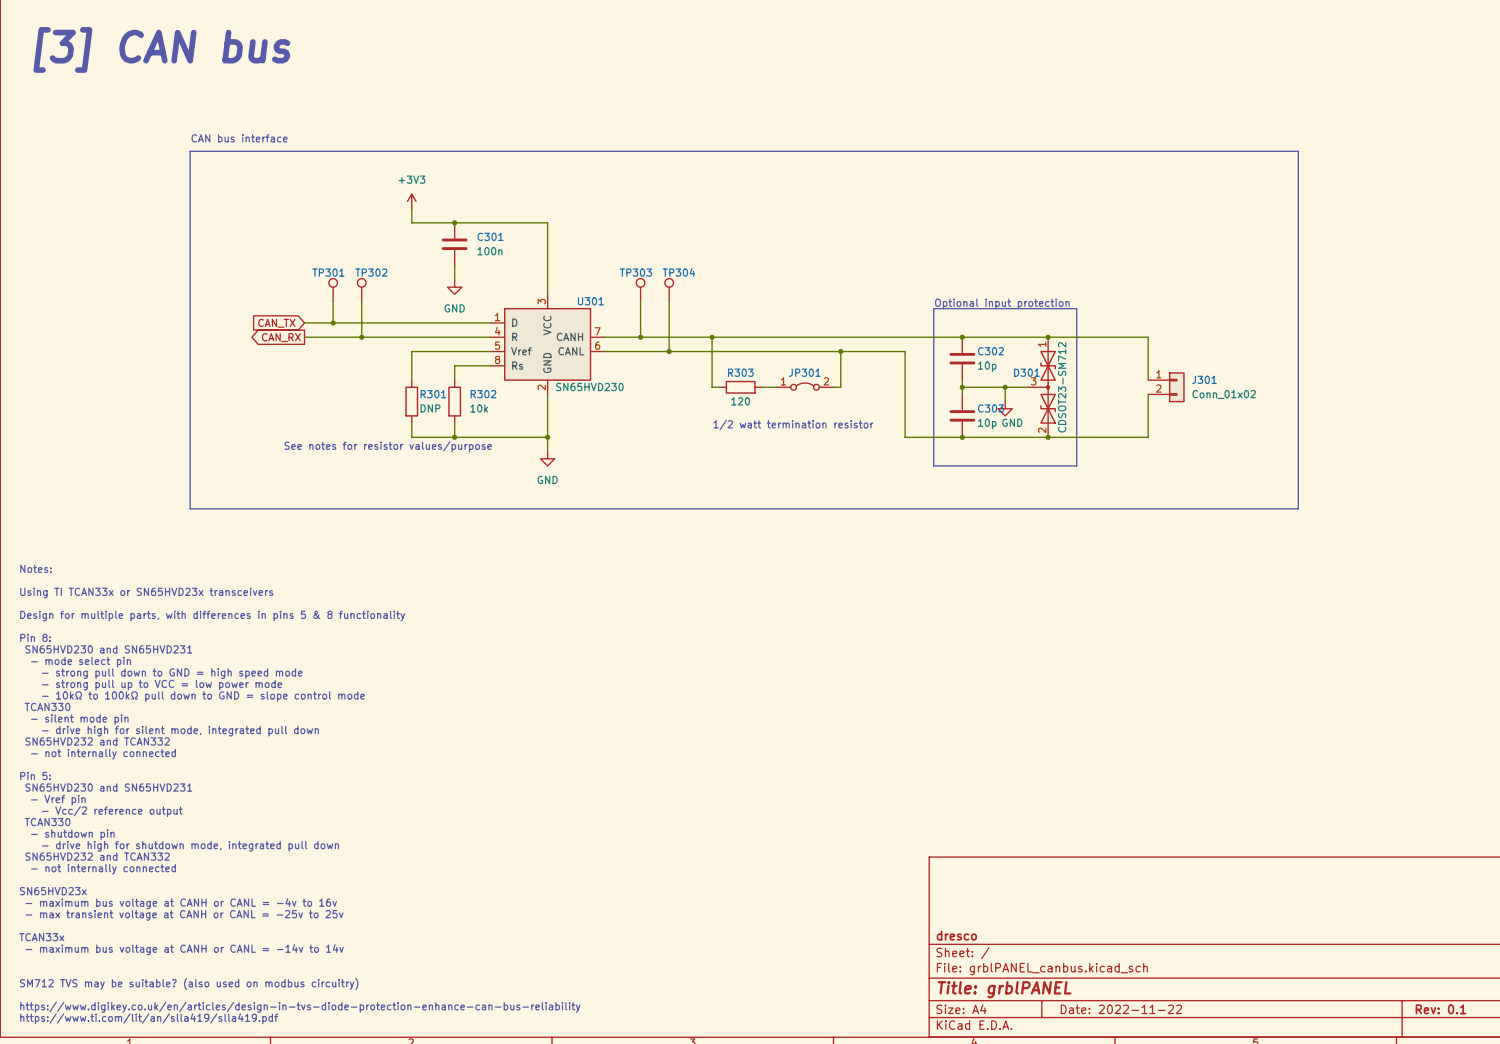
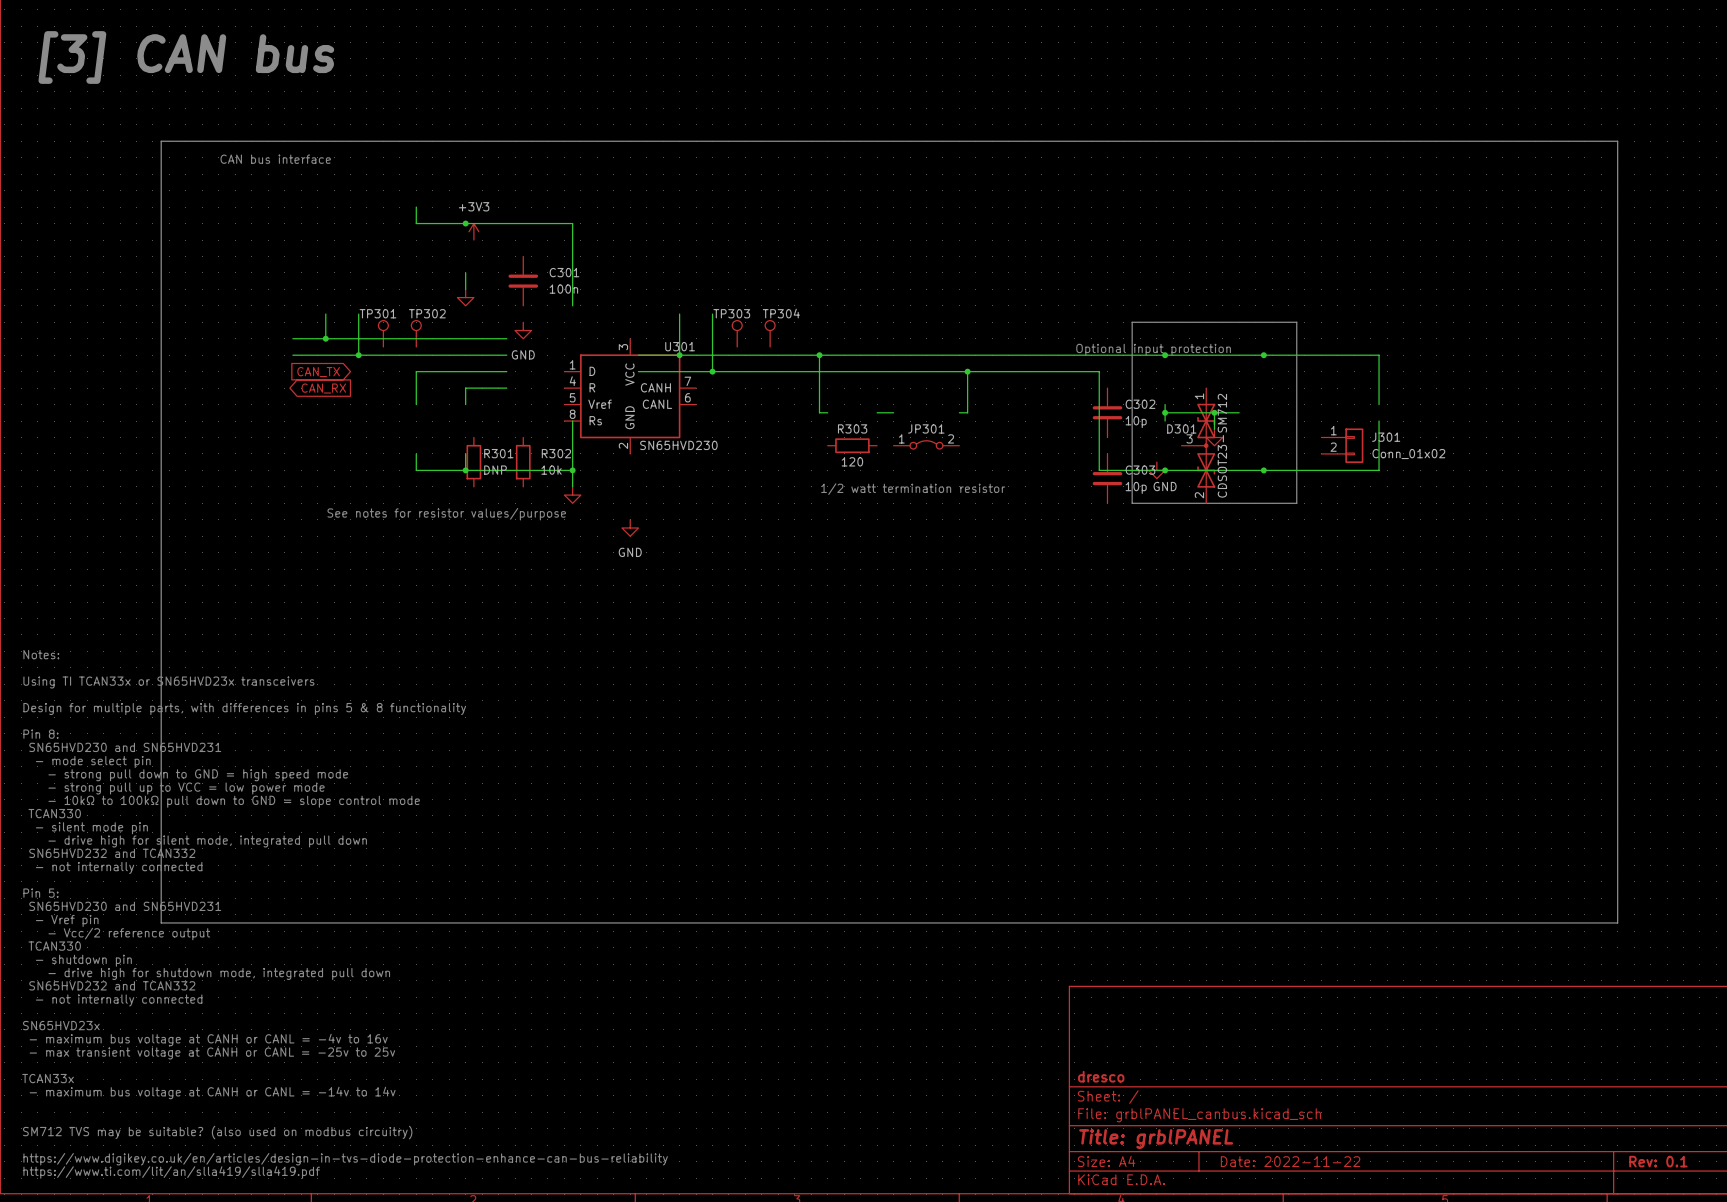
line: none -> (161, 141) (1617, 141) (1617, 922) (161, 922) (161, 141)
line: (190, 151) (1298, 151) (1298, 508) (190, 508) (190, 151) -> none
junction: none -> (465, 223)
wire: (411, 208) (411, 222) (547, 222) (547, 294) -> (416, 207) (416, 223) (572, 223) (572, 305)
junction: (454, 222) -> none
power symbol: none -> (465, 297)
wire: (454, 265) (454, 280) -> (465, 272) (465, 289)
wire: none -> (358, 314) (358, 355)
wire: none -> (292, 338) (506, 338)
junction: none -> (325, 338)
wire: (333, 301) (333, 322) -> (325, 314) (325, 338)
wire: (361, 301) (361, 322) (304, 322) -> none
wire: (640, 301) (640, 337) -> (679, 314) (679, 355)
wire: (669, 301) (669, 351) -> (712, 314) (712, 371)
wire: none -> (292, 355) (506, 355)
wire: none -> (638, 355) (1379, 355) (1379, 404)
junction: none -> (679, 355)
wire: none -> (819, 355) (819, 388)
line: (933, 308) (1076, 308) (1076, 465) (933, 465) (933, 308) -> (1132, 322) (1296, 322) (1296, 503) (1132, 503) (1132, 322)
junction: none -> (1165, 355)
junction: none -> (1263, 355)
junction position: (333, 322) -> (358, 355)
wire: (440, 322) (490, 322) -> none
wire: none -> (638, 371) (1099, 371) (1099, 470) (1379, 470) (1379, 421)
wire: none -> (967, 371) (967, 404)
wire: (304, 337) (404, 337) -> (465, 404) (465, 388)
wire: none -> (416, 388) (416, 404)
junction: (361, 337) -> none
wire: (440, 337) (490, 337) -> none
wire: (604, 337) (1148, 337) (1148, 380) -> none
junction position: (640, 337) -> (712, 371)
junction position: (712, 337) -> (819, 355)
junction: (962, 337) -> none
junction: (1048, 337) -> none
wire: (490, 351) (411, 351) (411, 380) -> none
wire: (604, 351) (905, 351) (905, 437) (1148, 437) (1148, 394) -> none
junction: (669, 351) -> none
junction position: (840, 351) -> (967, 371)
wire: (712, 358) (712, 387) (719, 387) -> (819, 412) (827, 412)
wire: (840, 358) (840, 387) (833, 387) -> (967, 412) (959, 412)
junction: none -> (1165, 412)
junction: none -> (1214, 412)
wire: (490, 365) (454, 365) (454, 380) -> none
wire: (962, 380) (962, 394) -> (1165, 404) (1165, 421)
power symbol: none -> (1214, 437)
wire: (762, 387) (776, 387) -> (877, 412) (893, 412)
wire: (962, 387) (1026, 387) -> (1165, 412) (1239, 412)
junction: (962, 387) -> none
wire: (1005, 387) (1005, 401) -> (1214, 412) (1214, 429)
junction: (1005, 387) -> none
wire: (547, 394) (547, 451) -> (572, 421) (572, 486)
junction: none -> (465, 470)
junction: none -> (572, 470)
junction: none -> (1165, 470)
junction: none -> (1263, 470)
wire: (411, 423) (411, 437) (547, 437) -> (416, 453) (416, 470) (572, 470)
wire: (454, 423) (454, 437) -> (465, 453) (465, 470)
power symbol: none -> (572, 495)
junction: (454, 437) -> none
junction: (547, 437) -> none
junction: (962, 437) -> none
junction: (1048, 437) -> none

